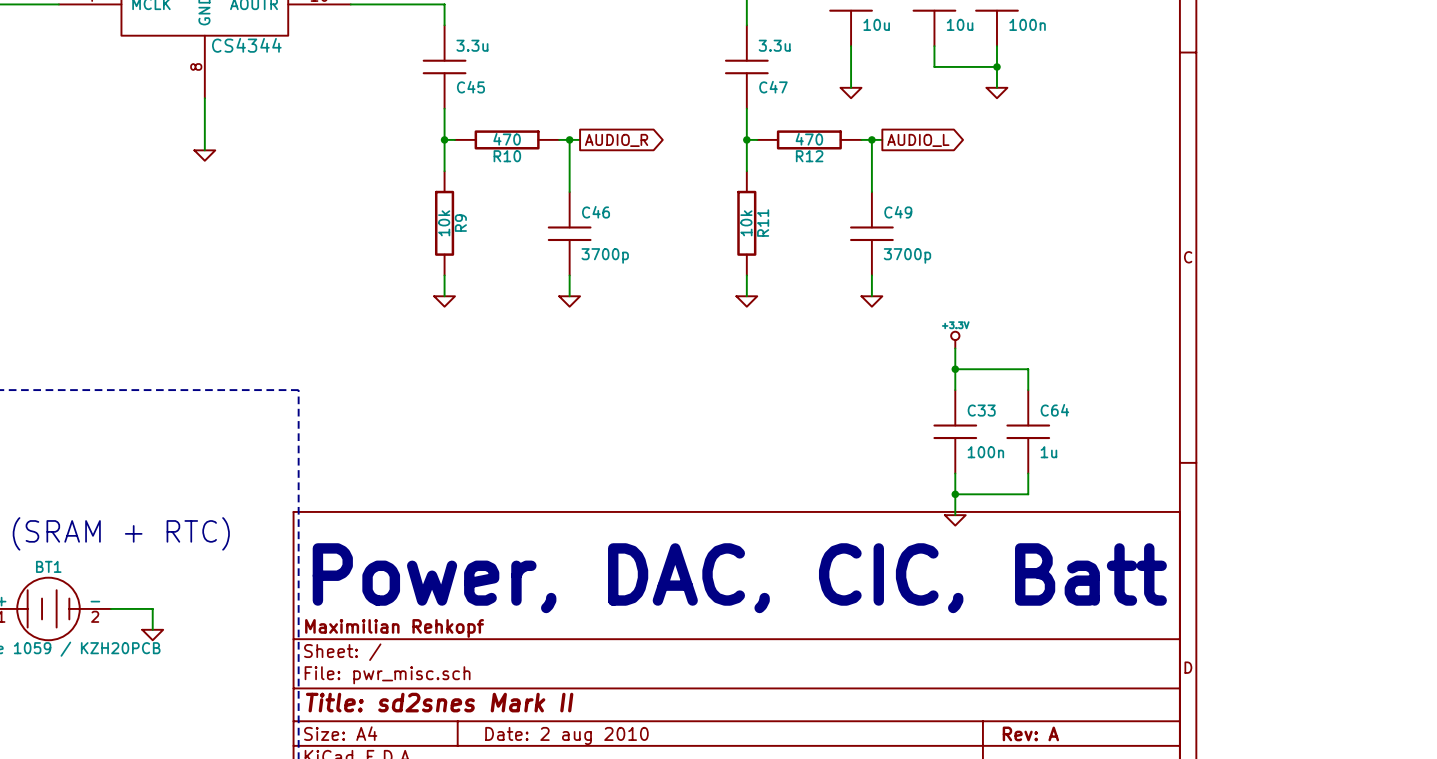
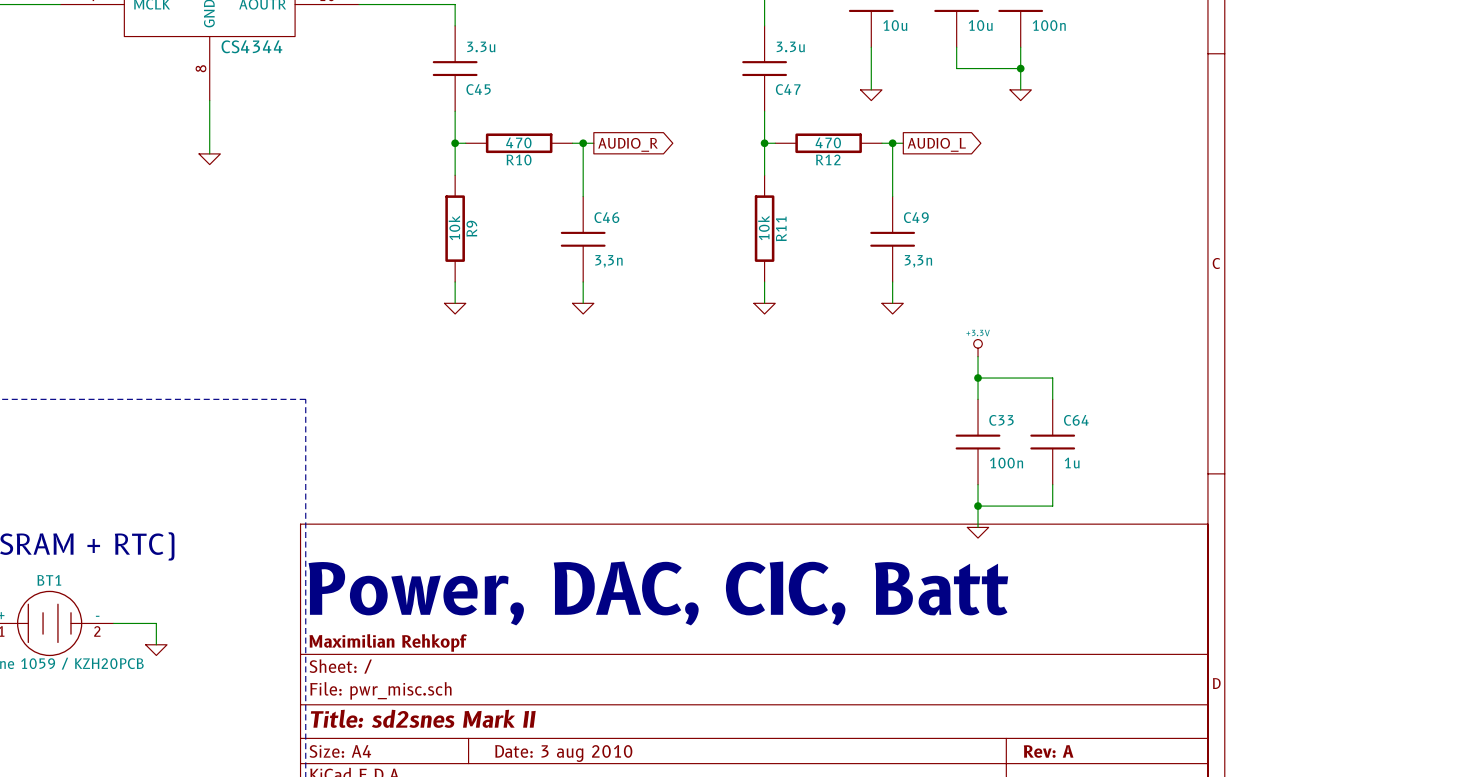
C46 value: 3700p (605, 255) -> 3,3n (608, 261)
C49 value: 3700p (907, 255) -> 3,3n (918, 261)
title block: Date: 2 aug 2010 (566, 735) -> Date: 3 aug 2010 (563, 753)

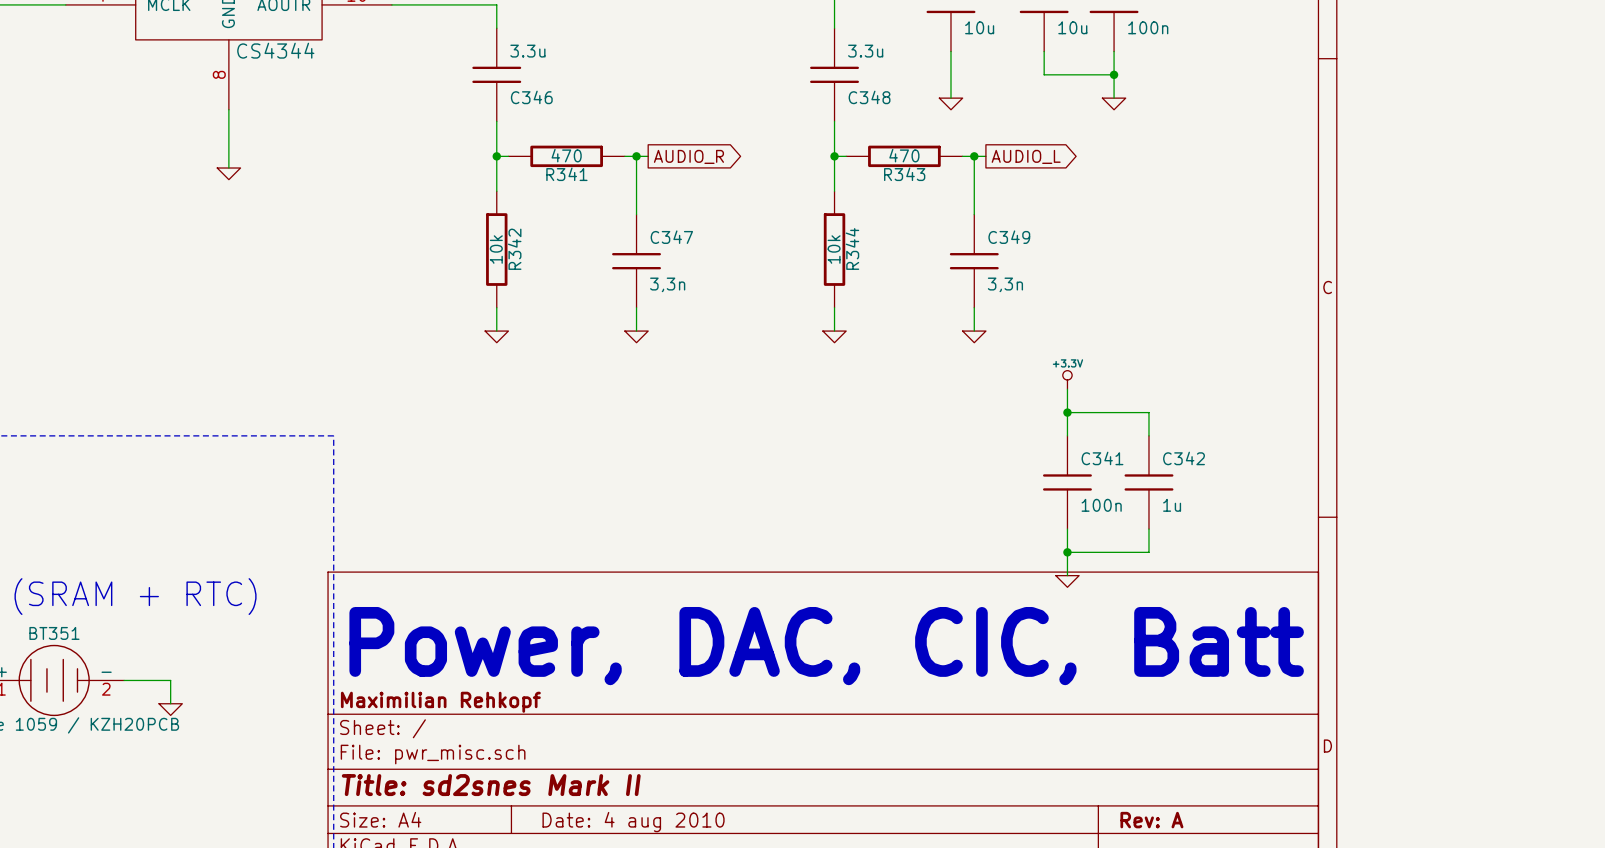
C45 name: C45 (478, 89) -> C346 (531, 97)
C47 name: C47 (788, 89) -> C348 (869, 97)
R10 name: R10 (519, 159) -> R341 (566, 174)
R12 name: R12 (828, 159) -> R343 (904, 174)
C46 name: C46 (606, 217) -> C347 (671, 237)
C49 name: C49 (916, 217) -> C349 (1009, 237)
R9 name: R9 (471, 228) -> R342 (514, 249)
R11 name: R11 (781, 228) -> R344 (852, 248)
C33 name: C33 (1001, 420) -> C341 (1102, 458)
C64 name: C64 (1076, 420) -> C342 (1184, 458)
BT1 name: BT1 (49, 580) -> BT351 (54, 633)
title block: Date: 3 aug 2010 (563, 753) -> Date: 4 aug 2010 (633, 822)

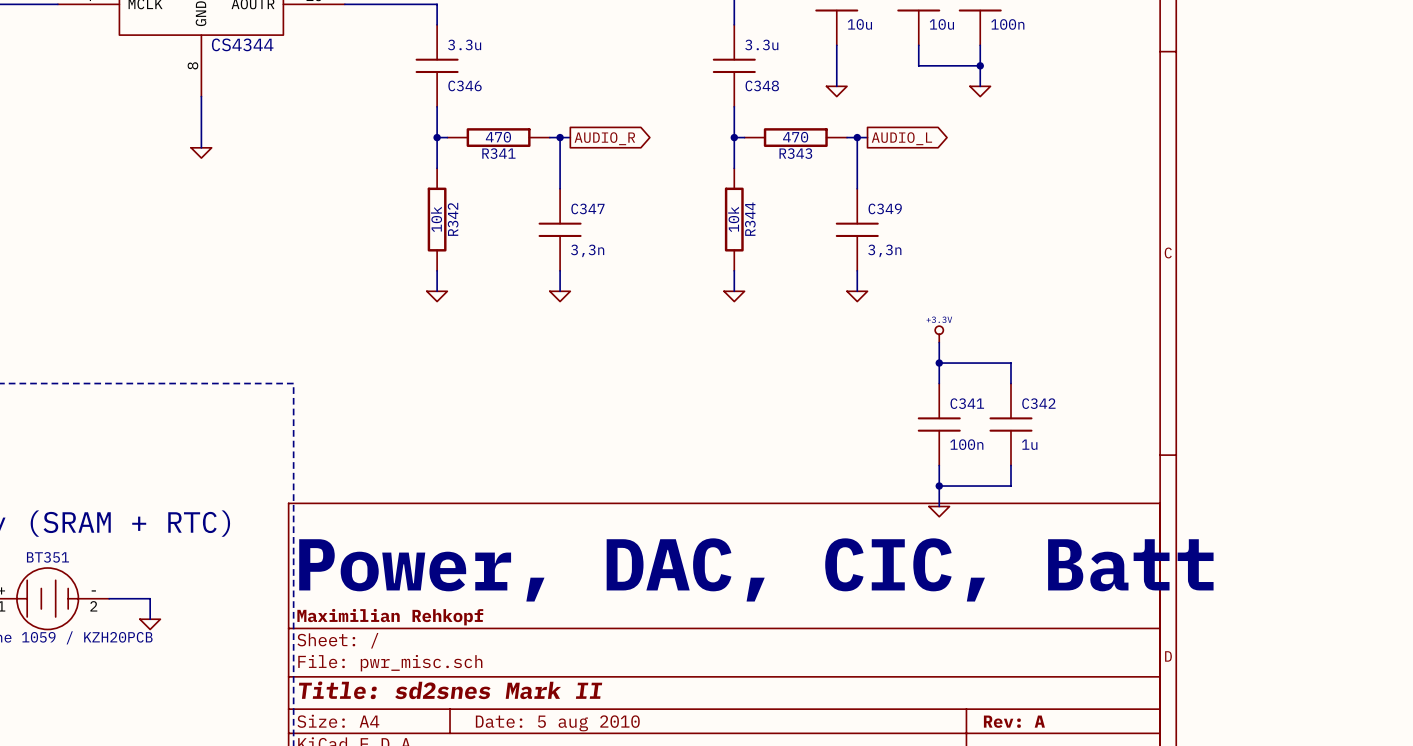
title block: Date: 4 aug 2010 (633, 822) -> Date: 5 aug 2010 (557, 723)

